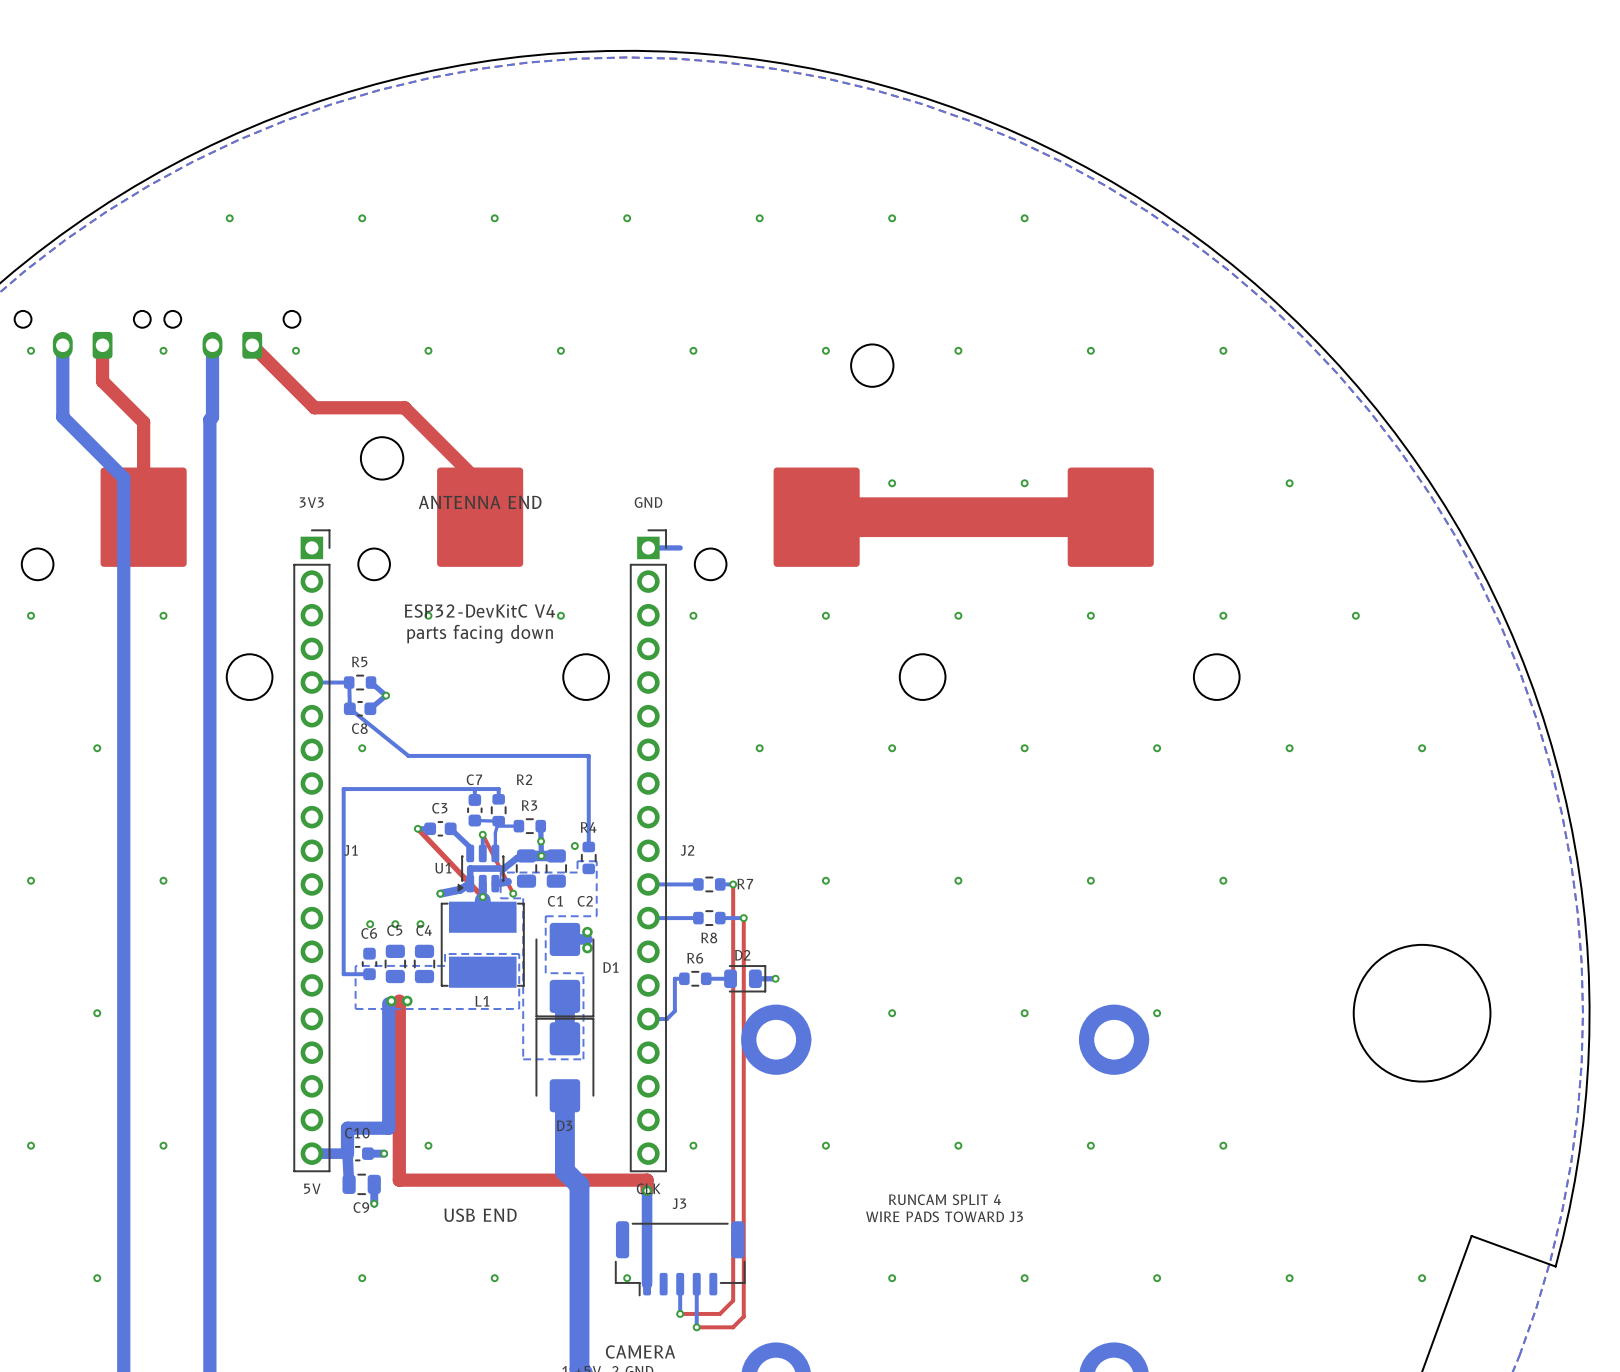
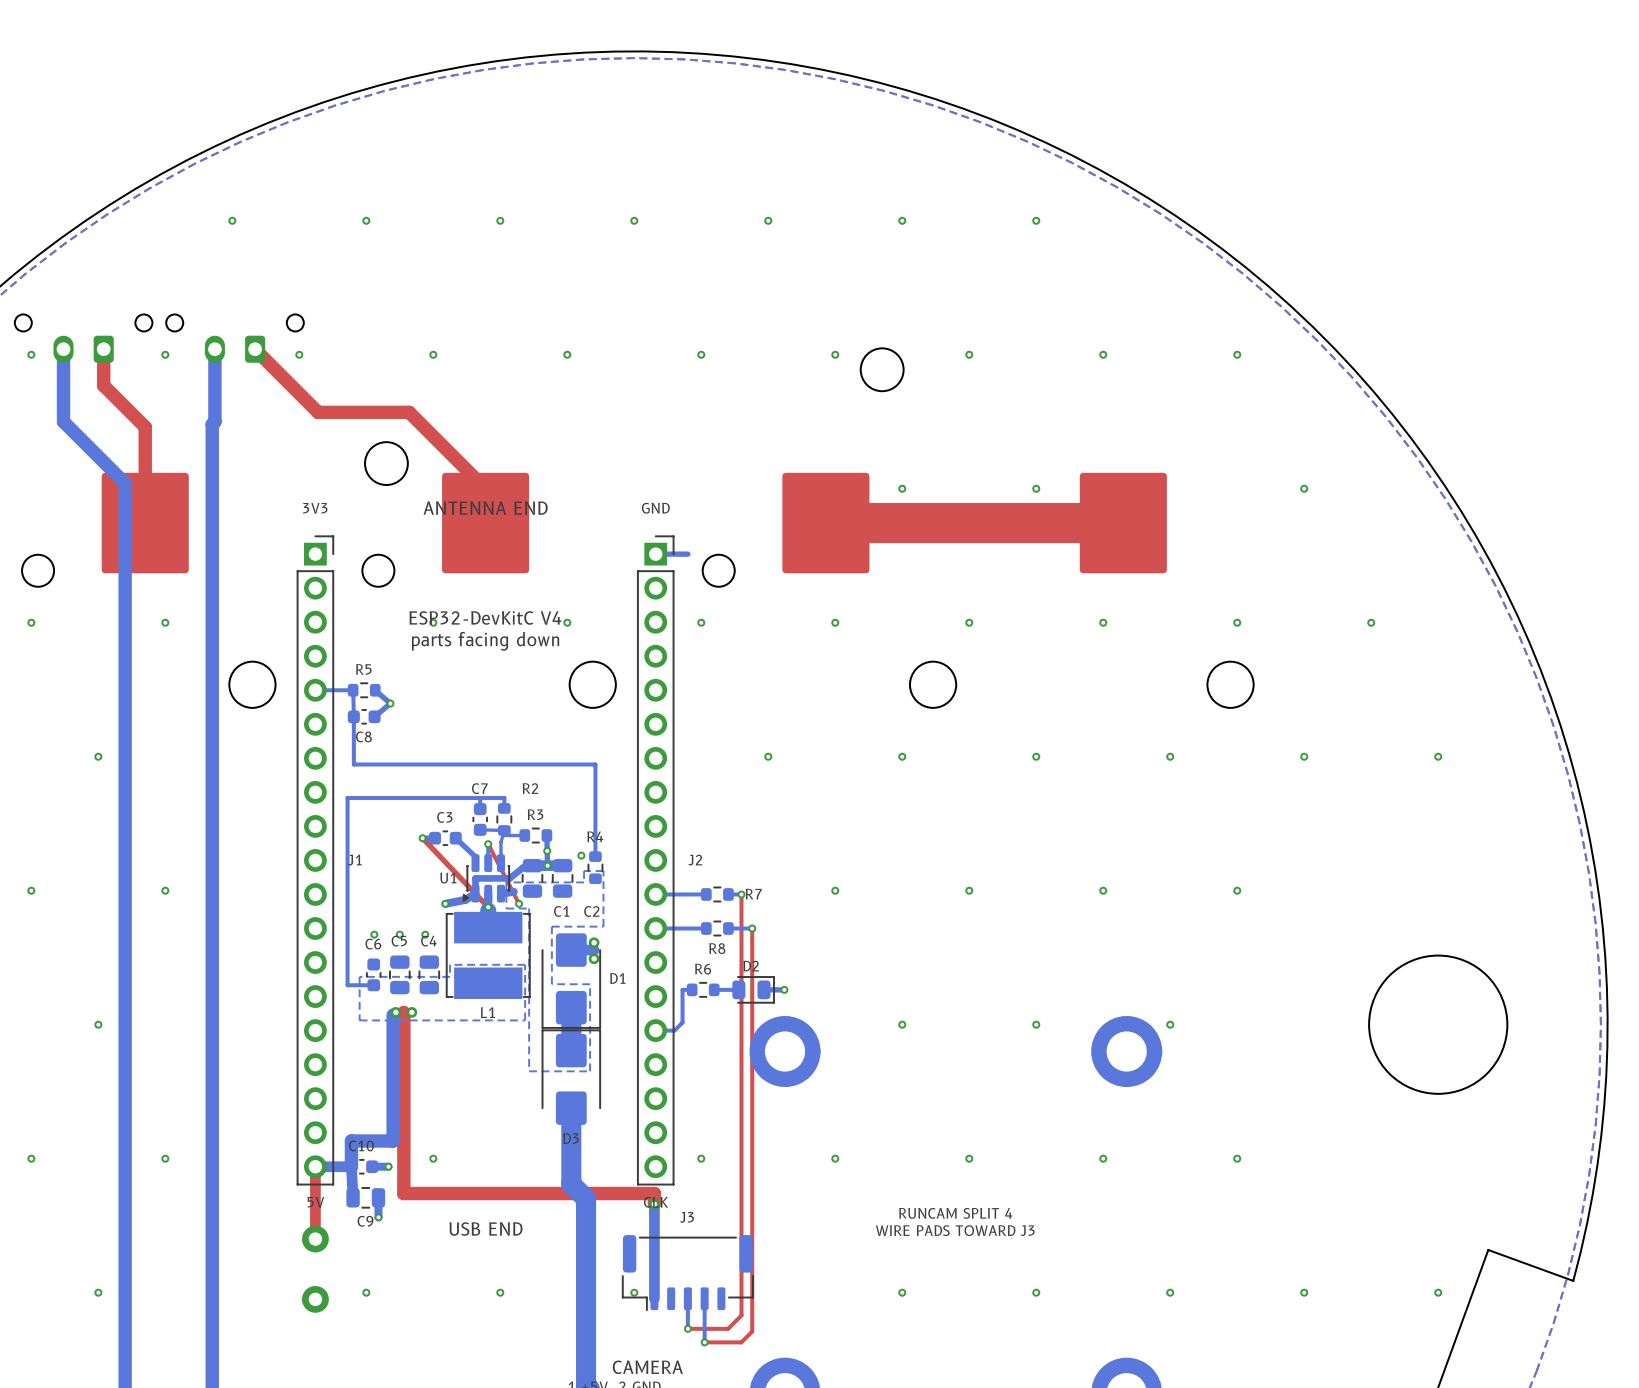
bottom track: (349, 708) (408, 755) -> (353, 716) (353, 764) (413, 764)
via: (362, 748) -> none
top track: none -> (315, 1166) (315, 1239)
part: none -> (315, 1239)
part: none -> (315, 1299)

